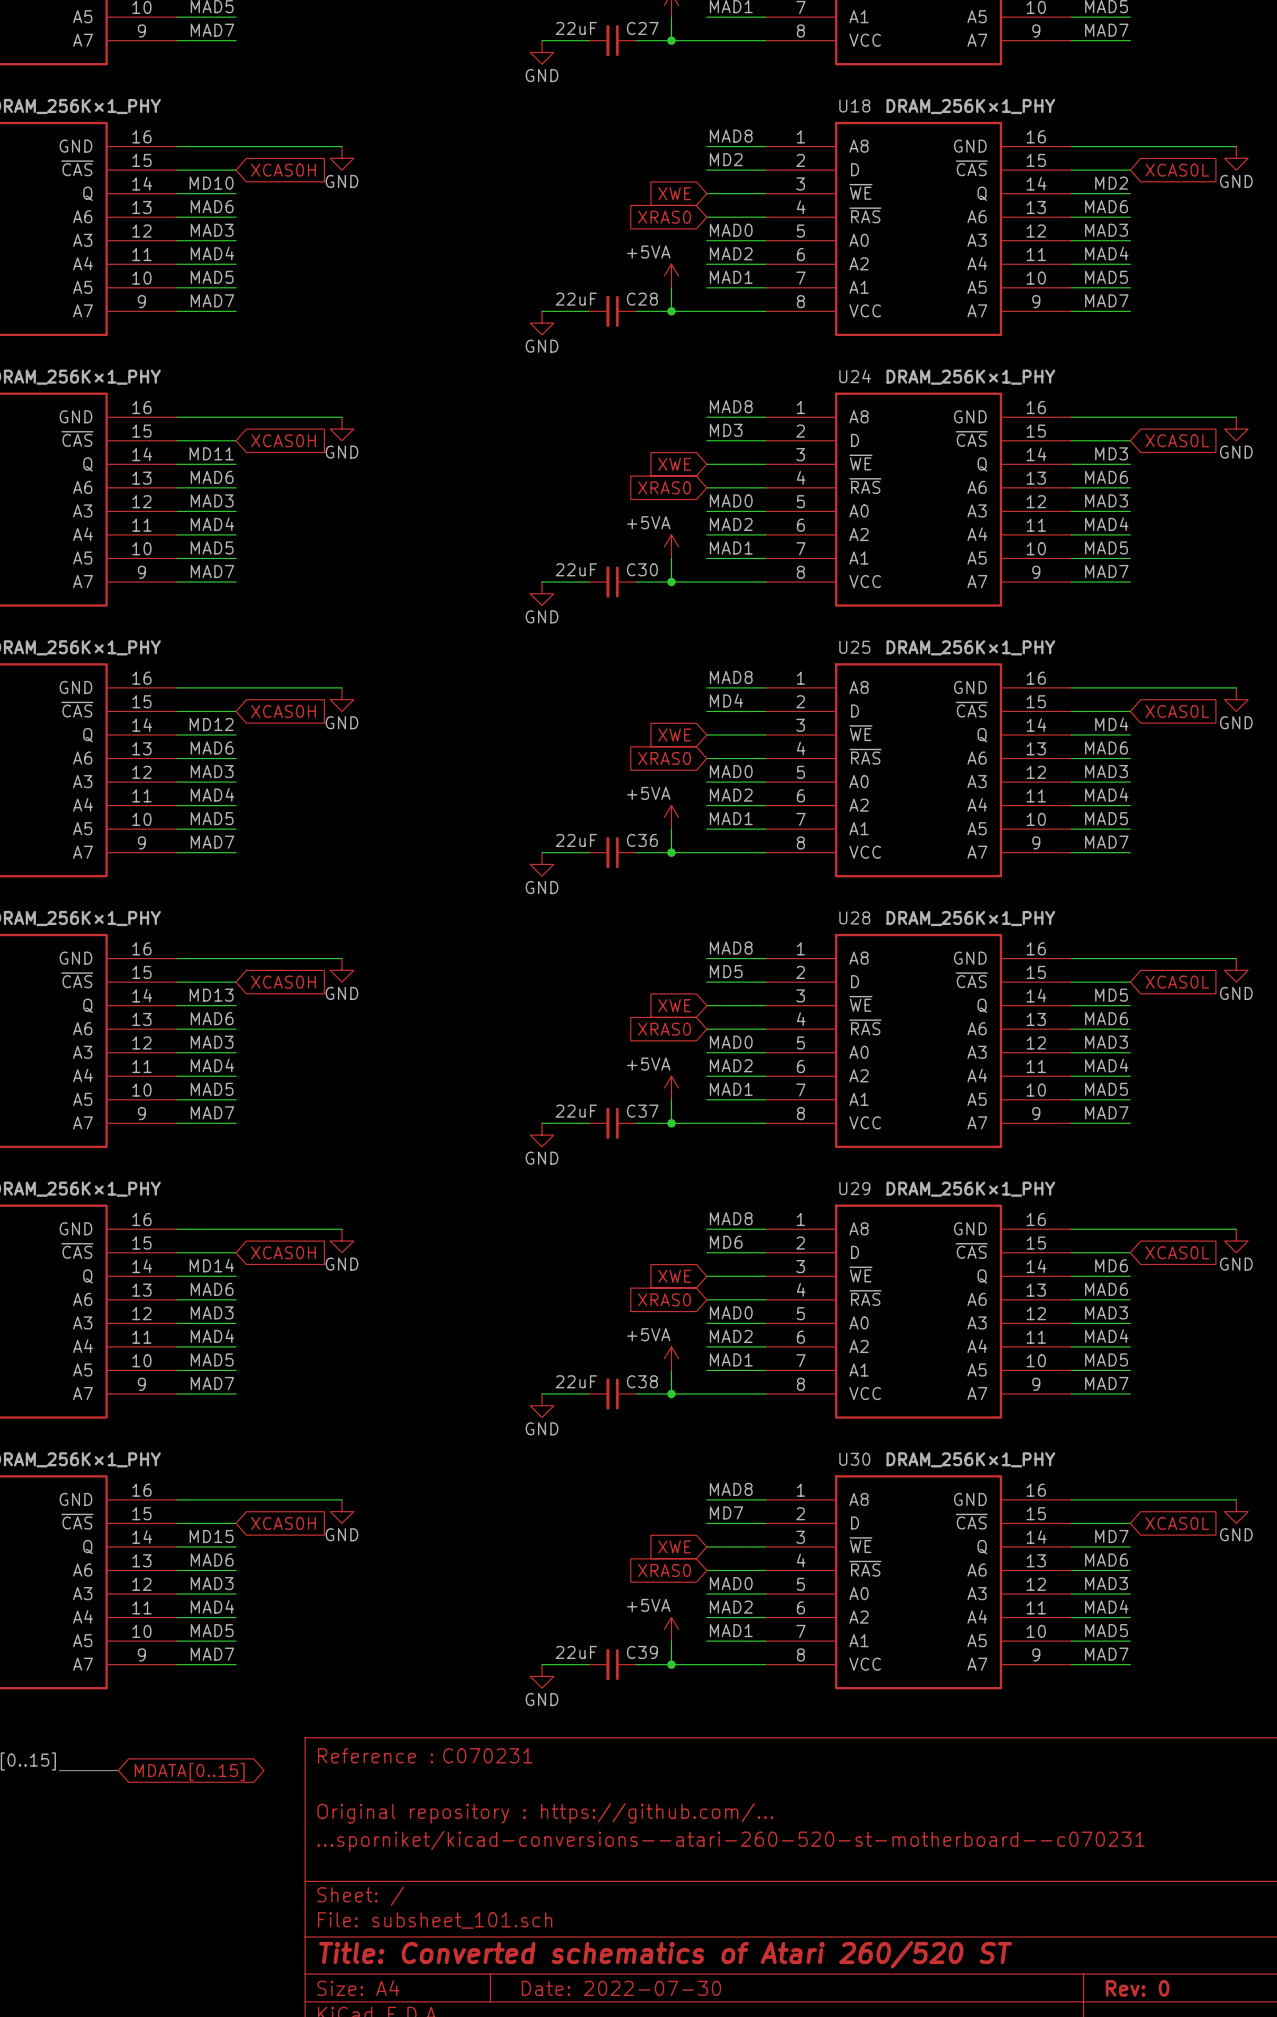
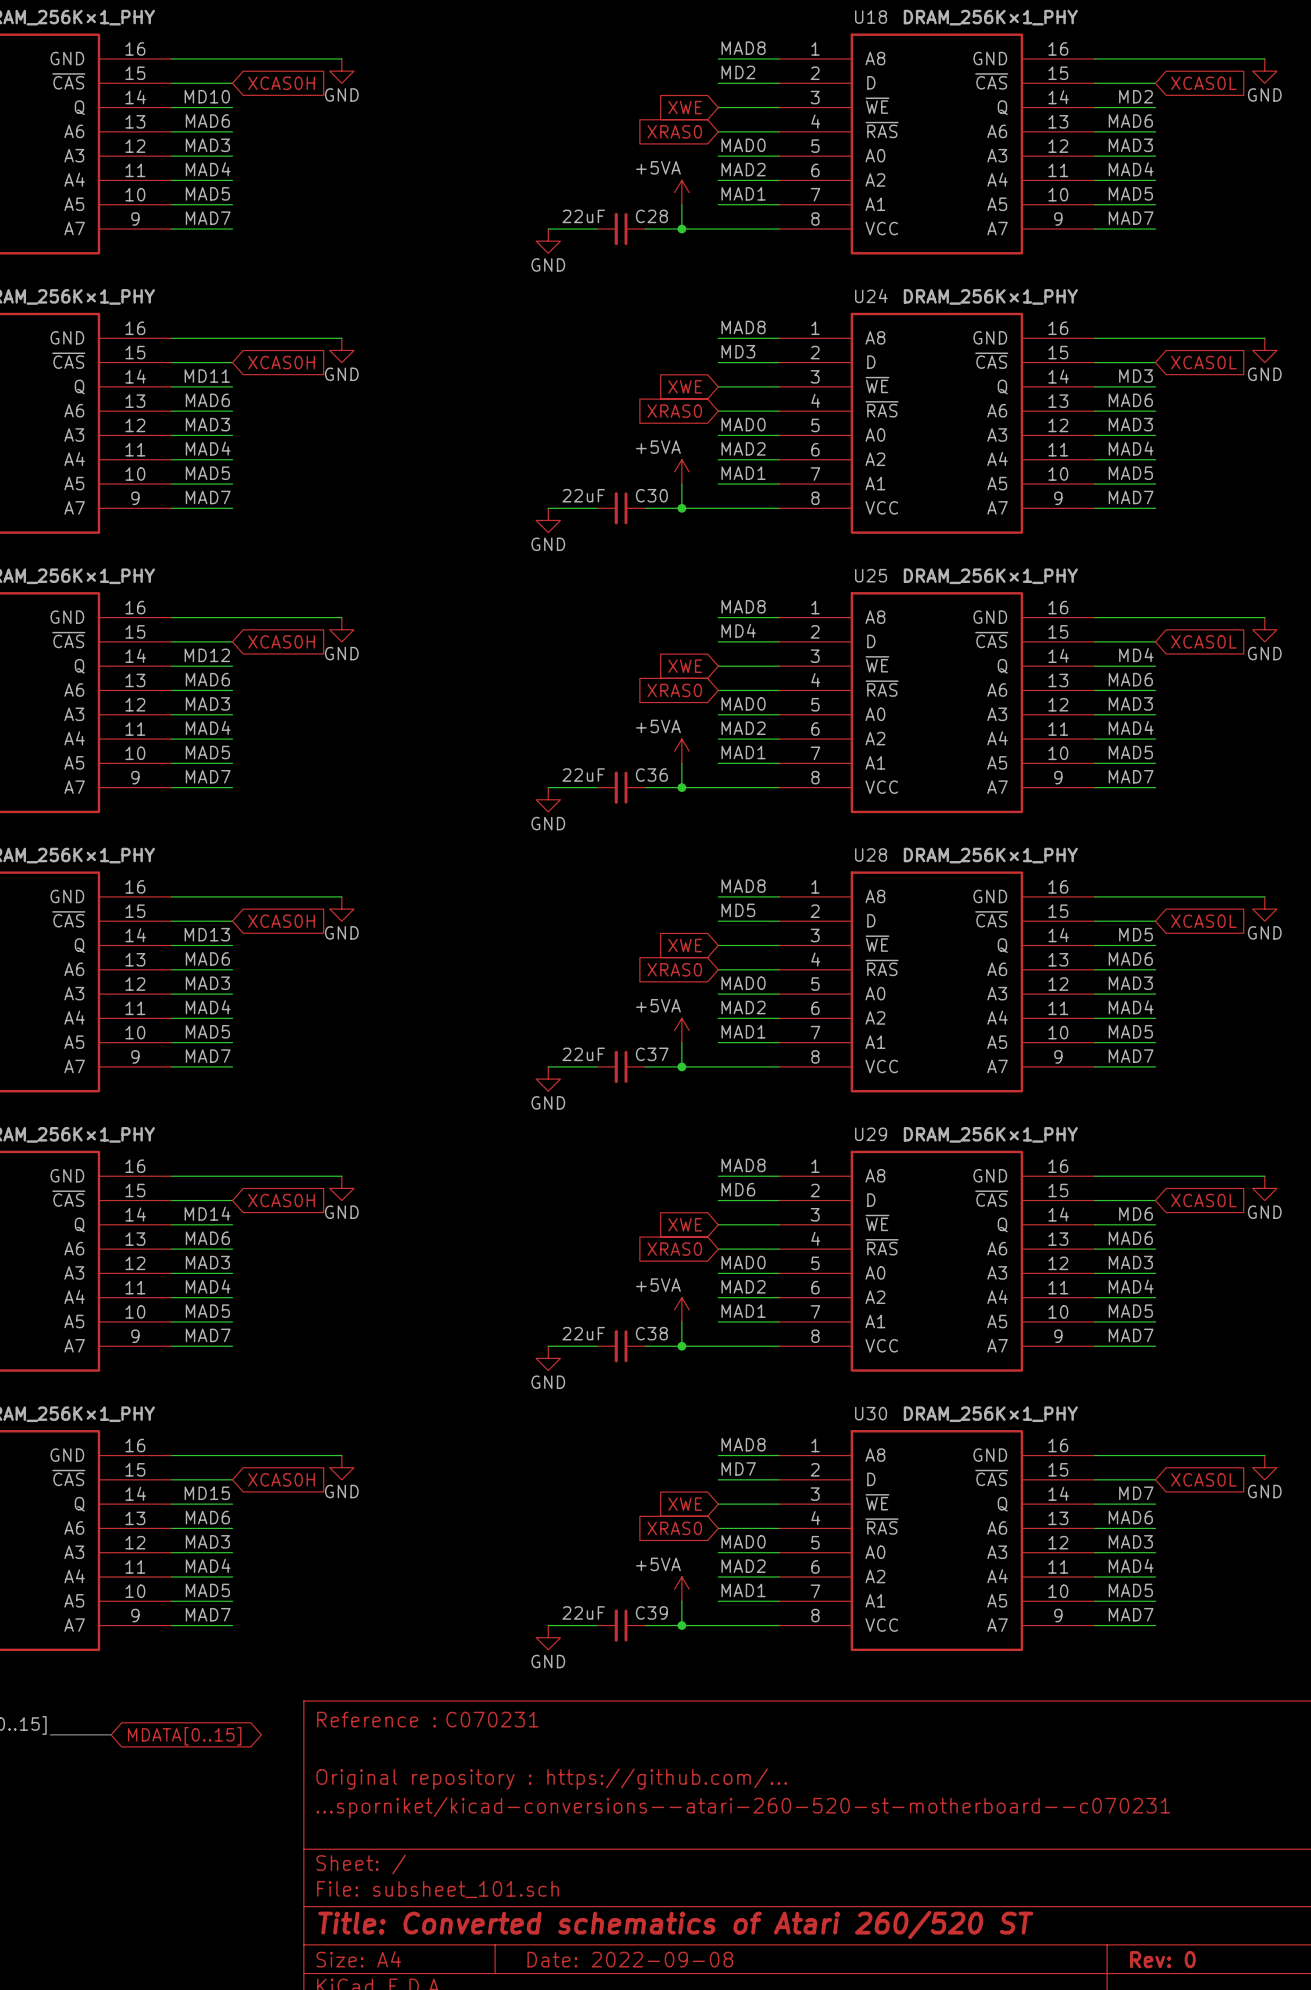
title block: Date: 2022-07-30 (621, 1988) -> Date: 2022-09-08 (630, 1959)

